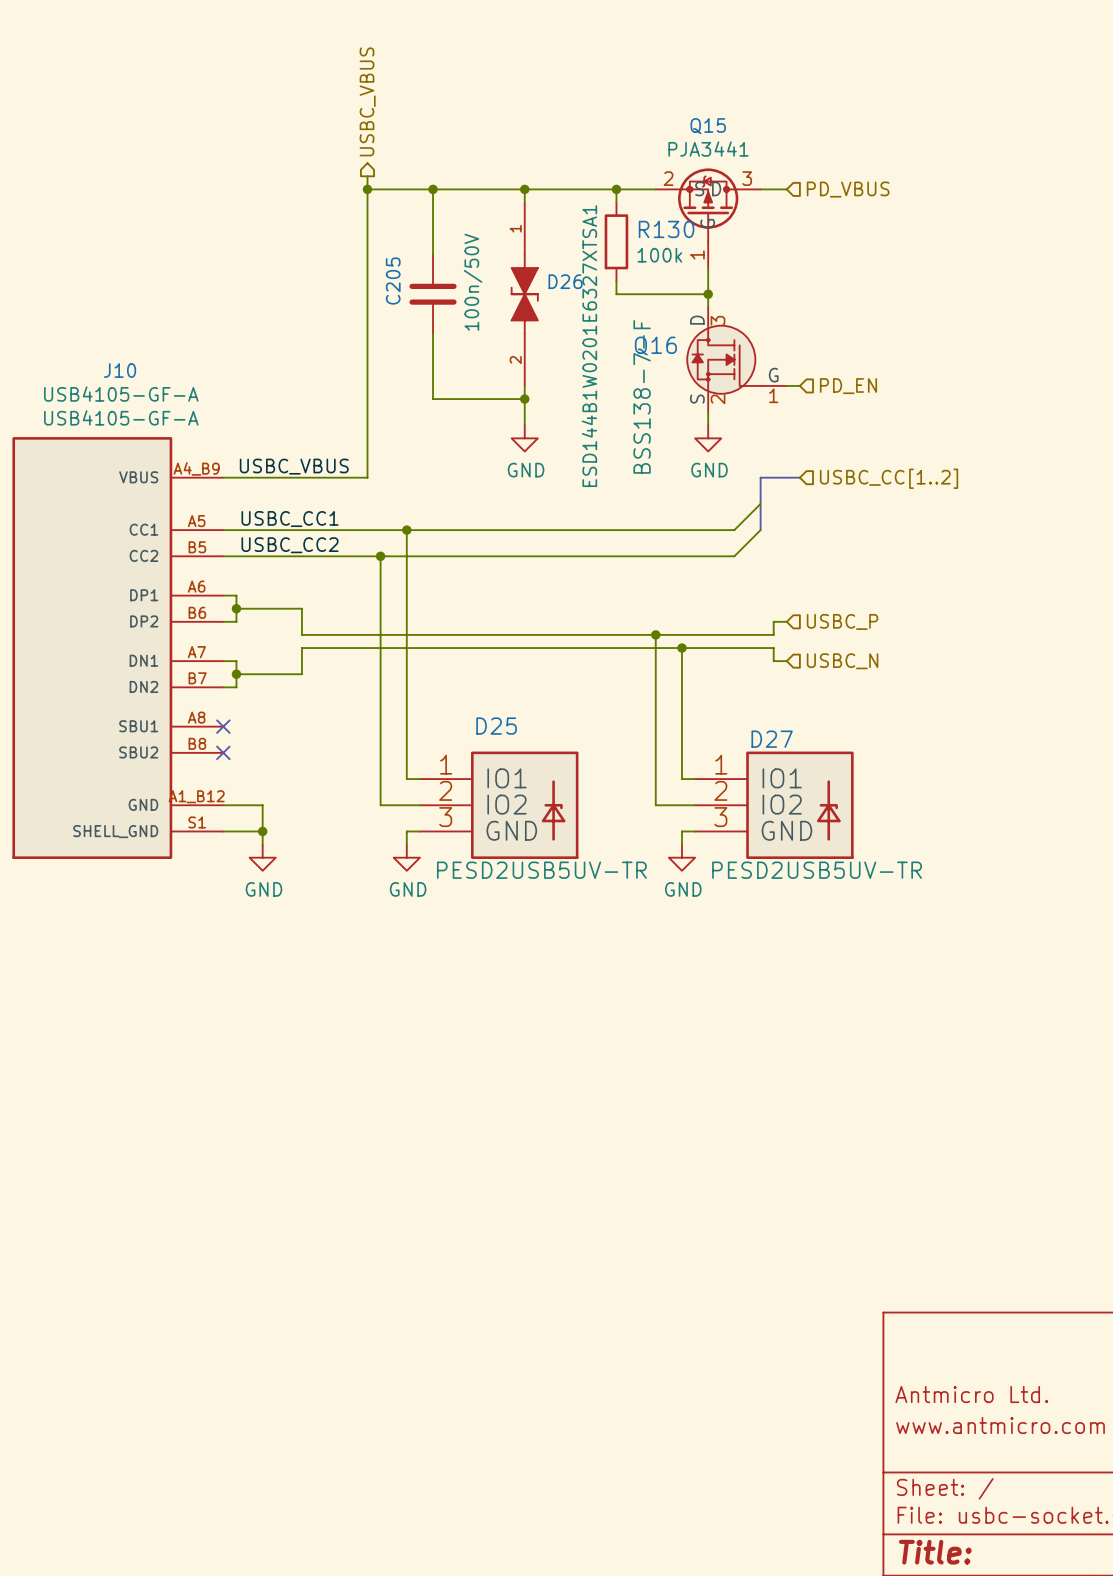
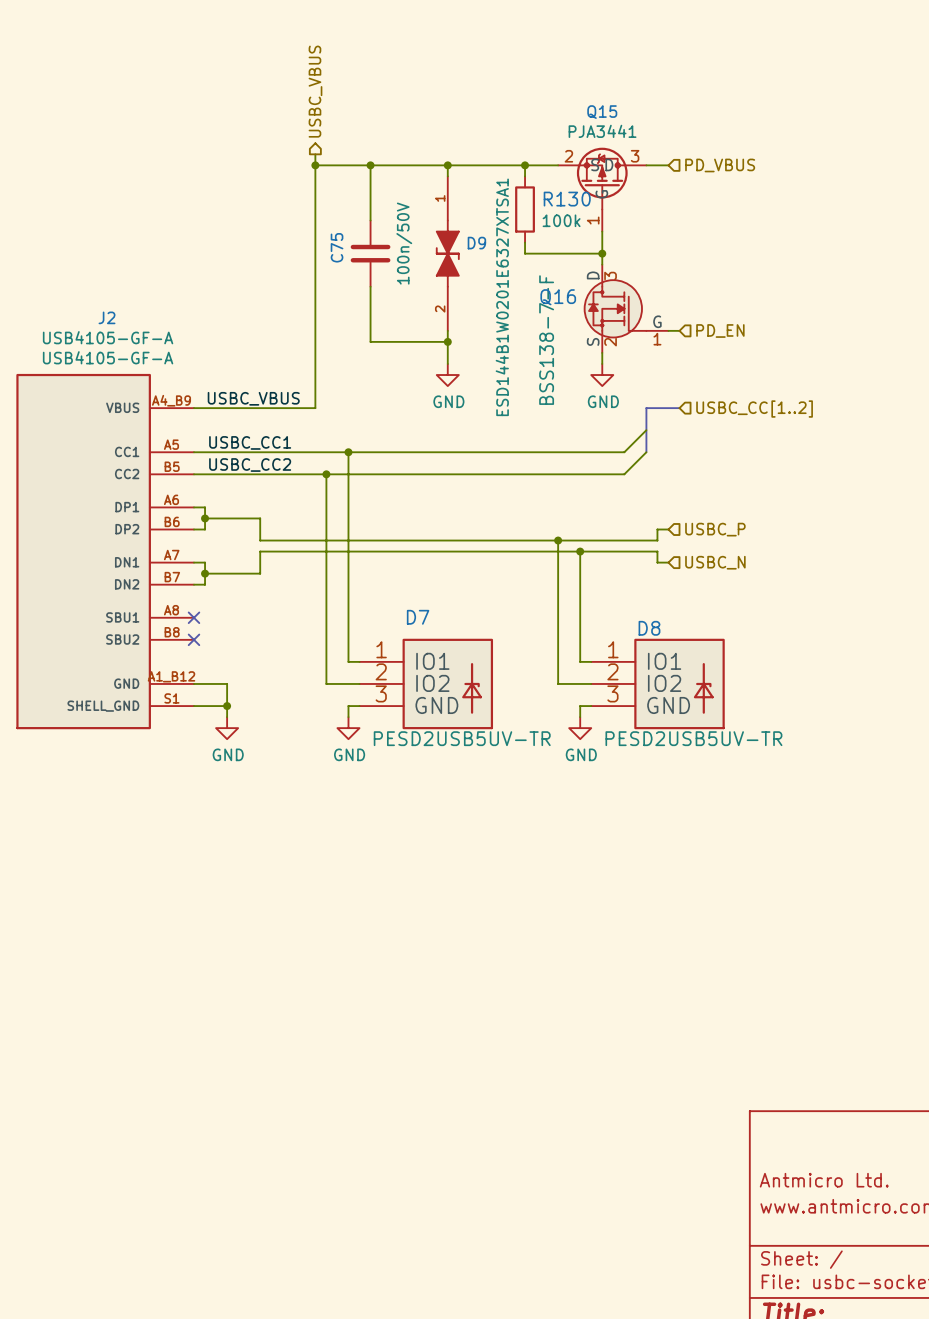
C205 name: C205 (393, 281) -> C75 (337, 247)
D26 name: D26 (565, 281) -> D9 (476, 243)
J10 name: J10 (120, 370) -> J2 (107, 317)
D25 name: D25 (496, 726) -> D7 (418, 617)
D27 name: D27 (772, 739) -> D8 (649, 628)

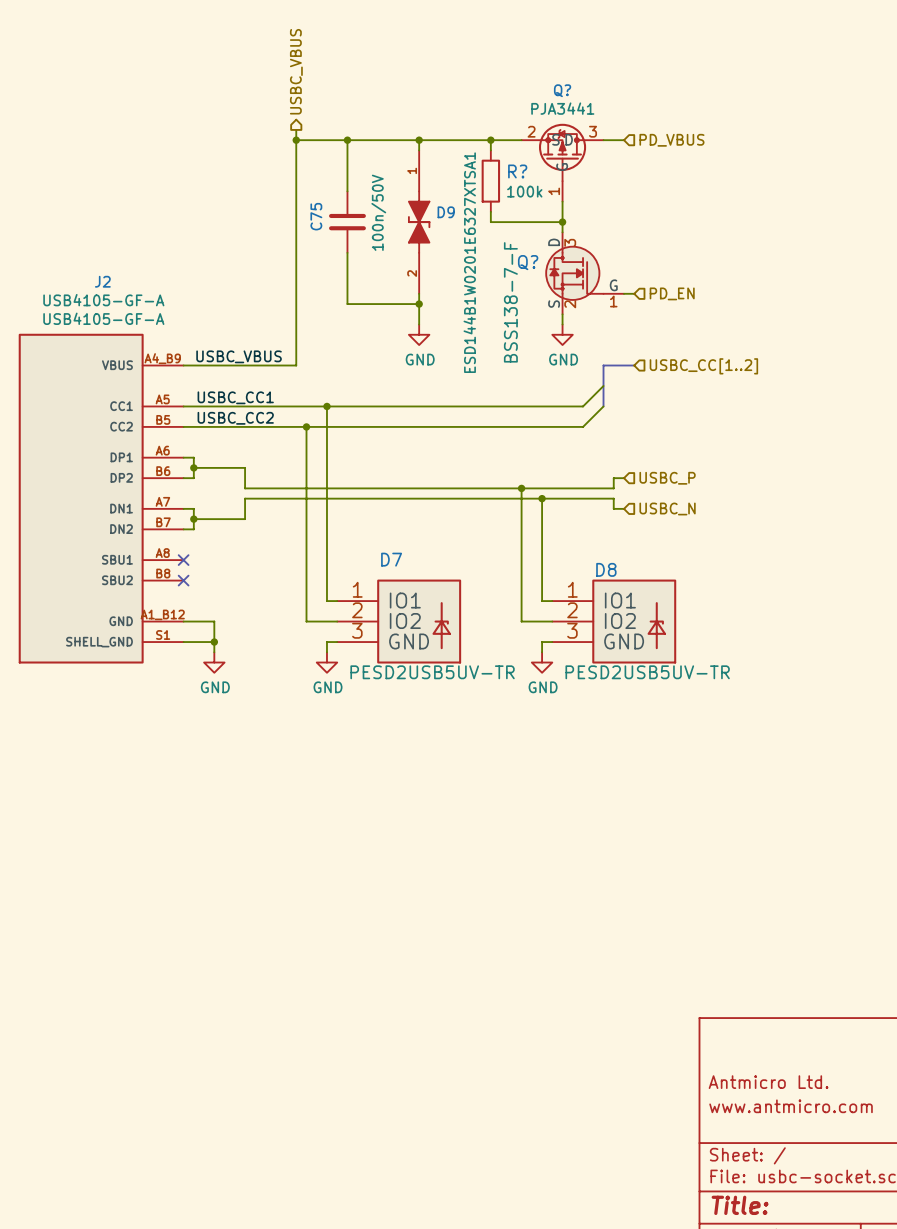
Q15 name: Q15 (602, 112) -> Q? (562, 90)
R130 name: R130 (567, 199) -> R? (517, 171)
Q16 name: Q16 (558, 297) -> Q? (528, 262)

